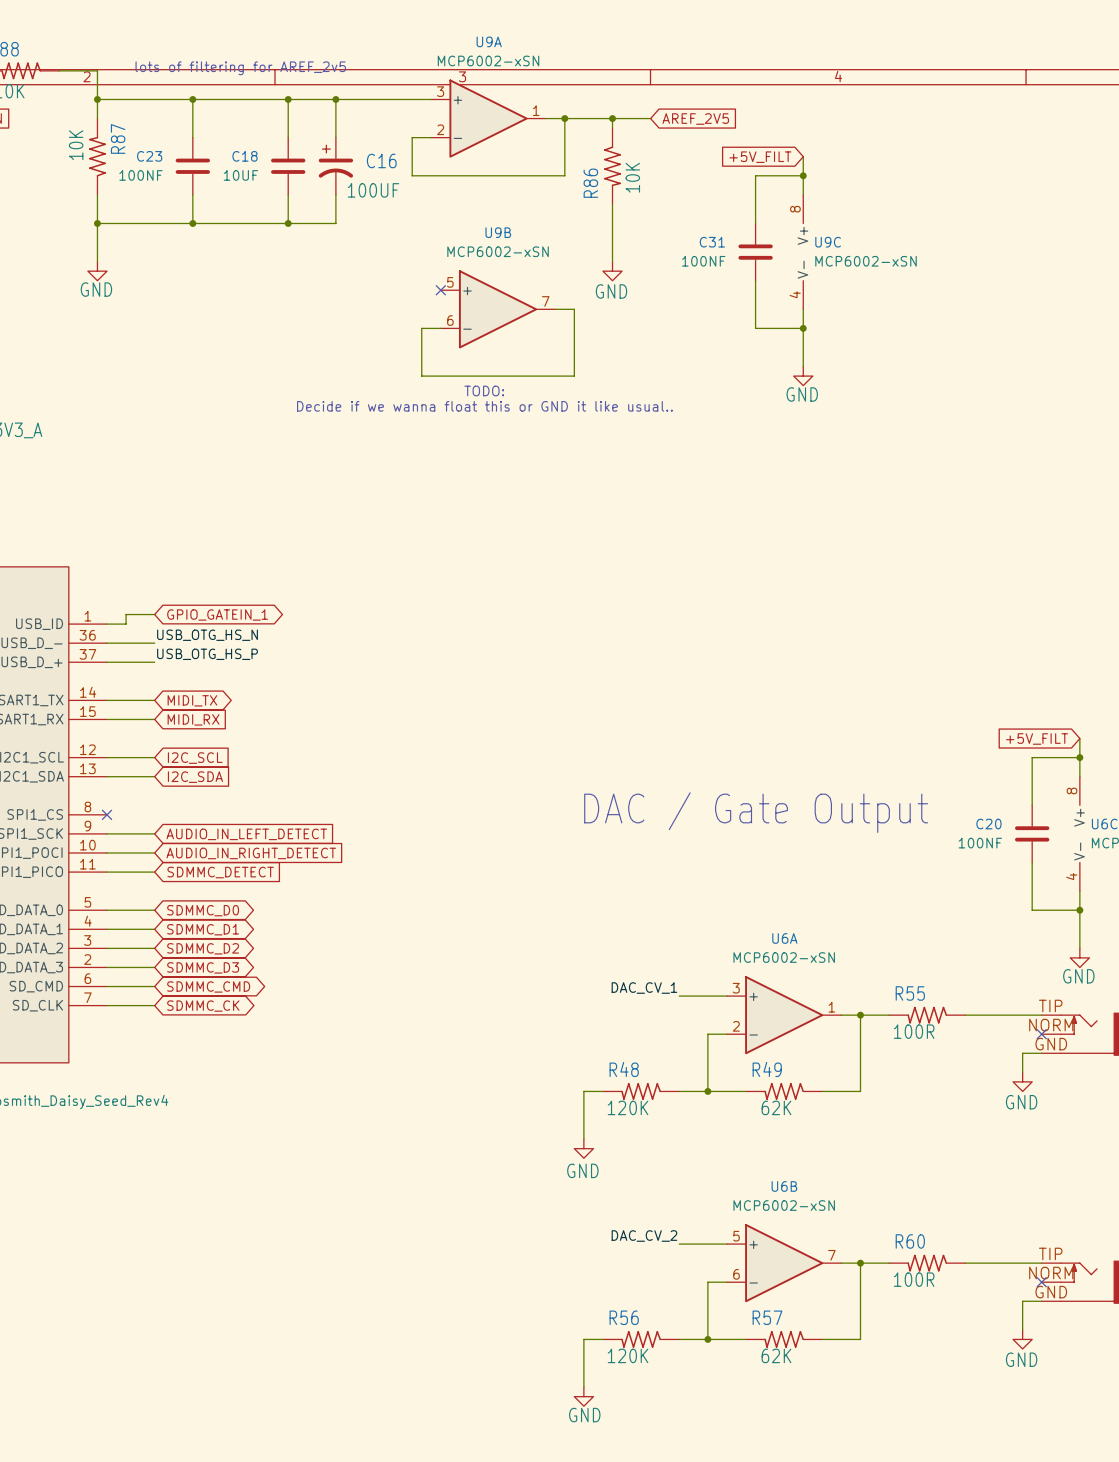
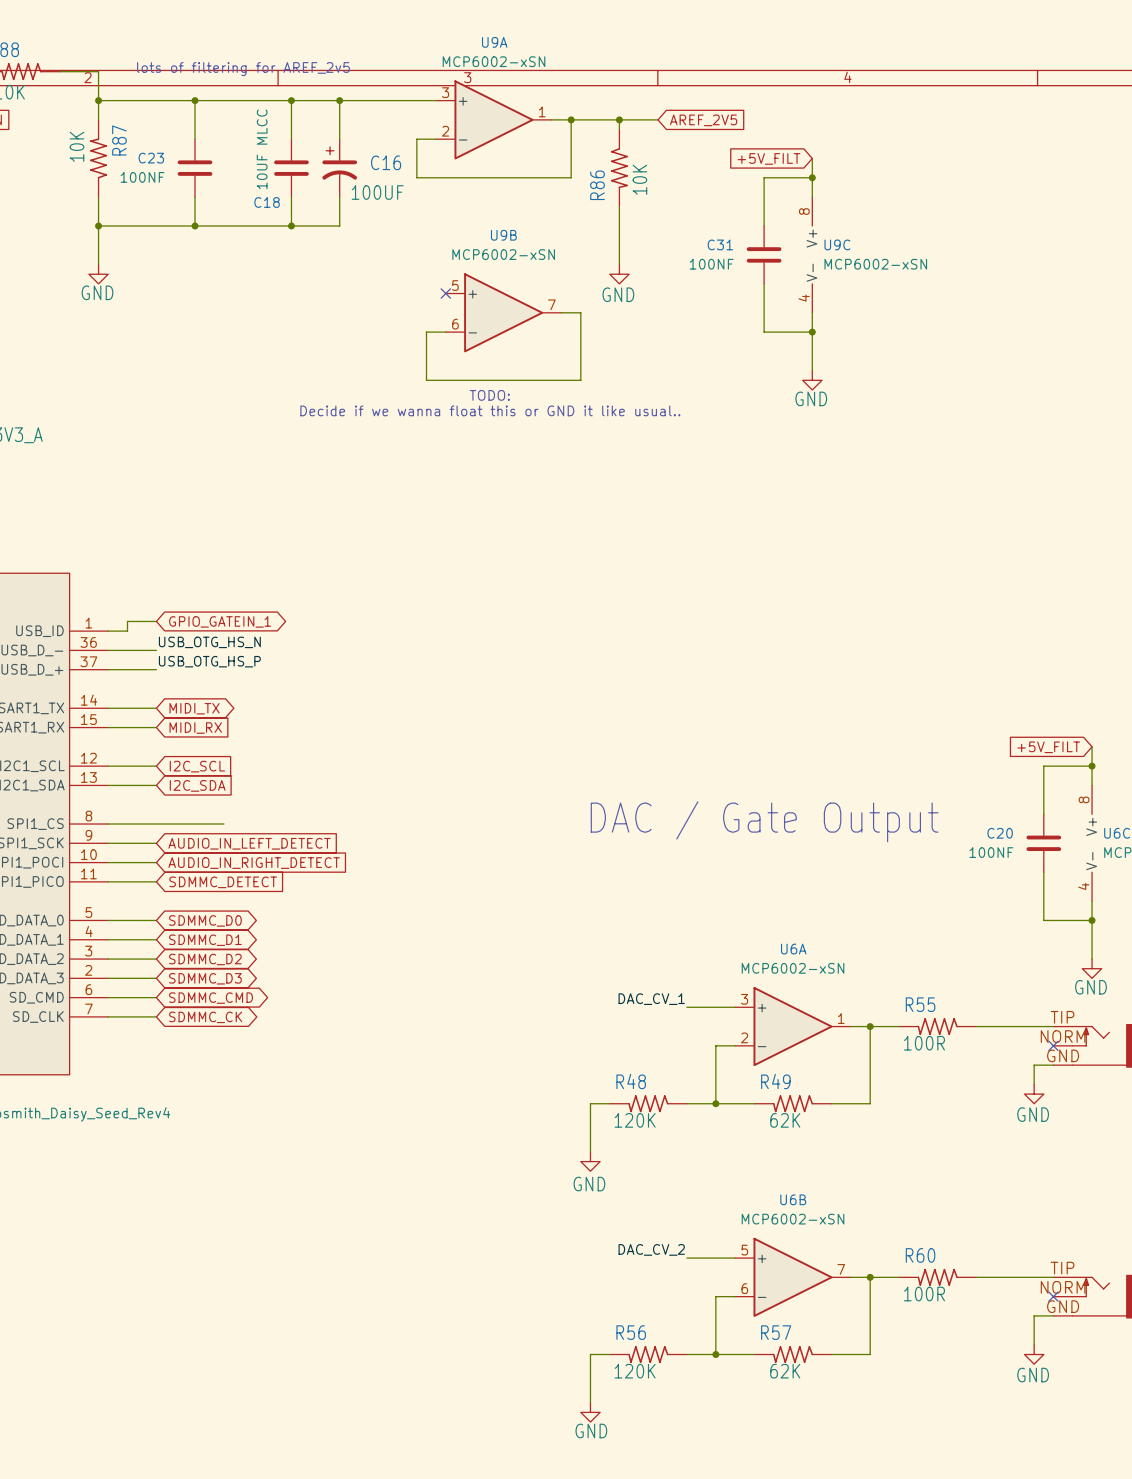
C18 name position: C18 (244, 156) -> C18 (267, 202)
C18 value: 10UF (240, 175) -> 10UF MLCC (262, 149)
wire: none -> (108, 824) (223, 824)
no-connect mark: (106, 814) -> none

